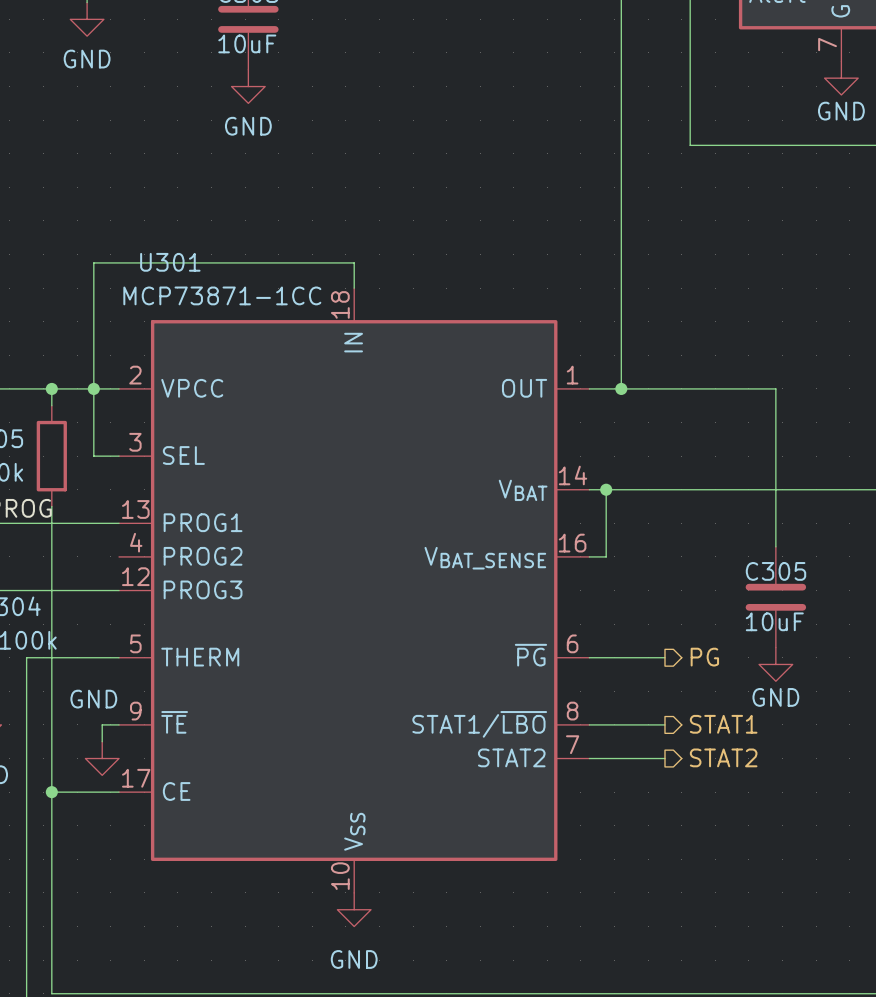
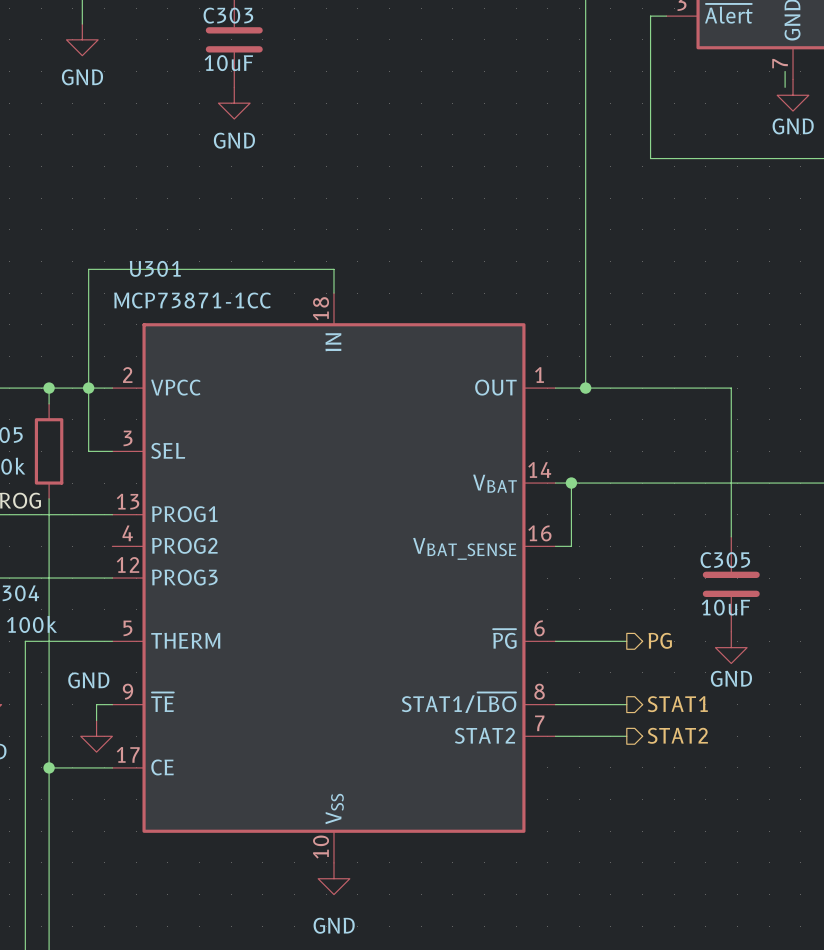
wire: none -> (785, 71) (785, 87)

